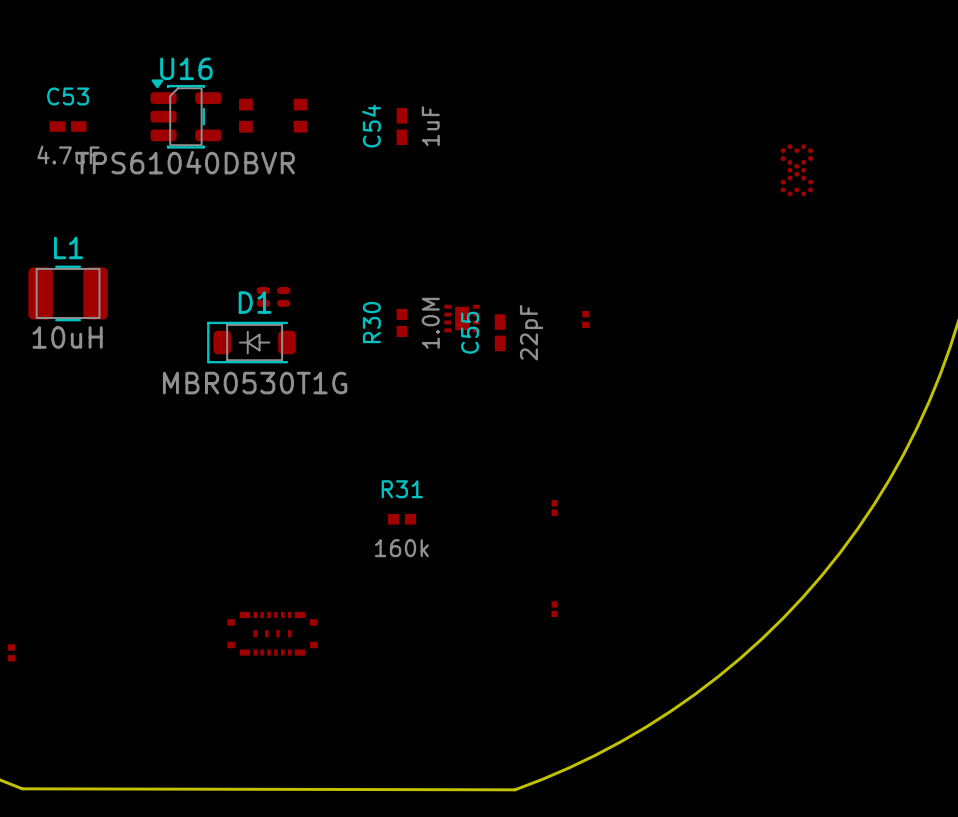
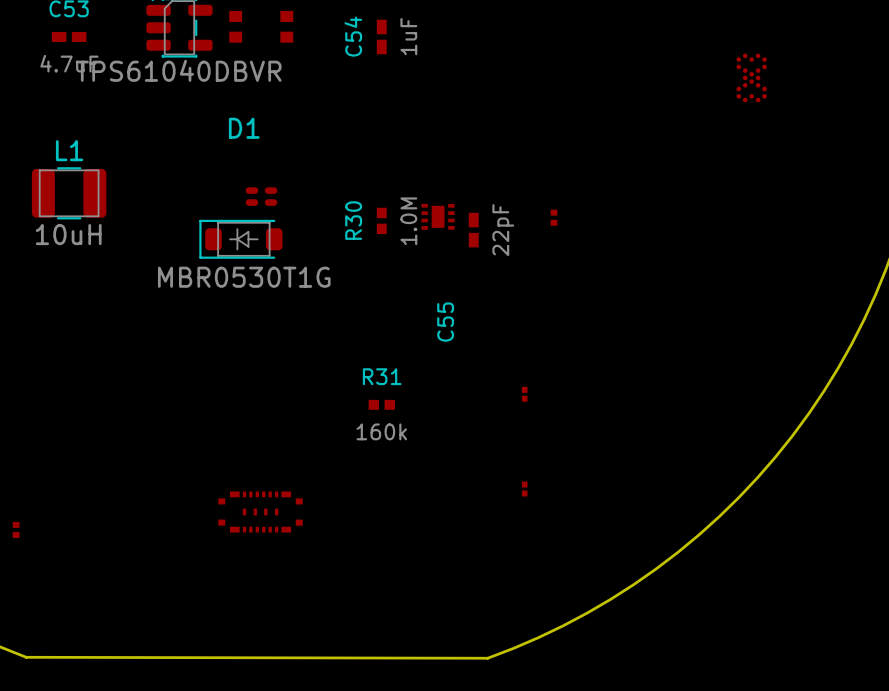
D1 name position: D1 (255, 302) -> D1 (244, 128)
C55 name position: C55 (470, 332) -> C55 (445, 322)

